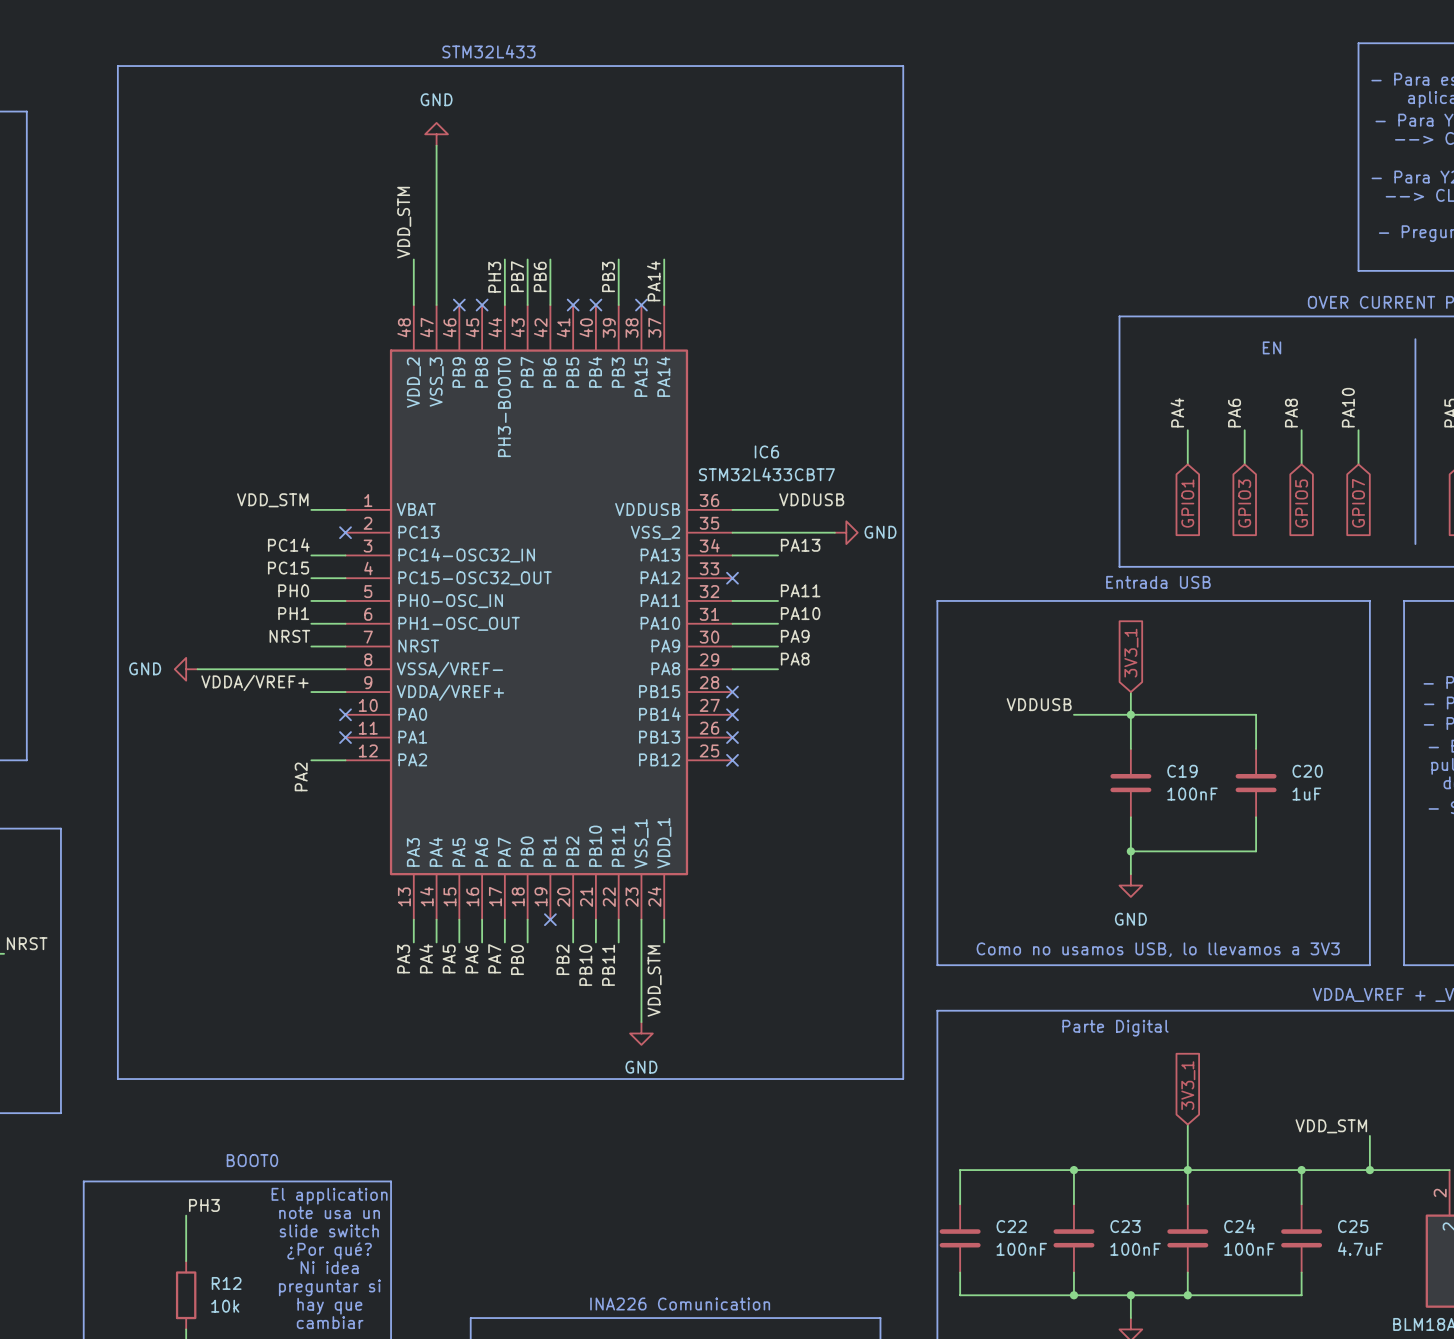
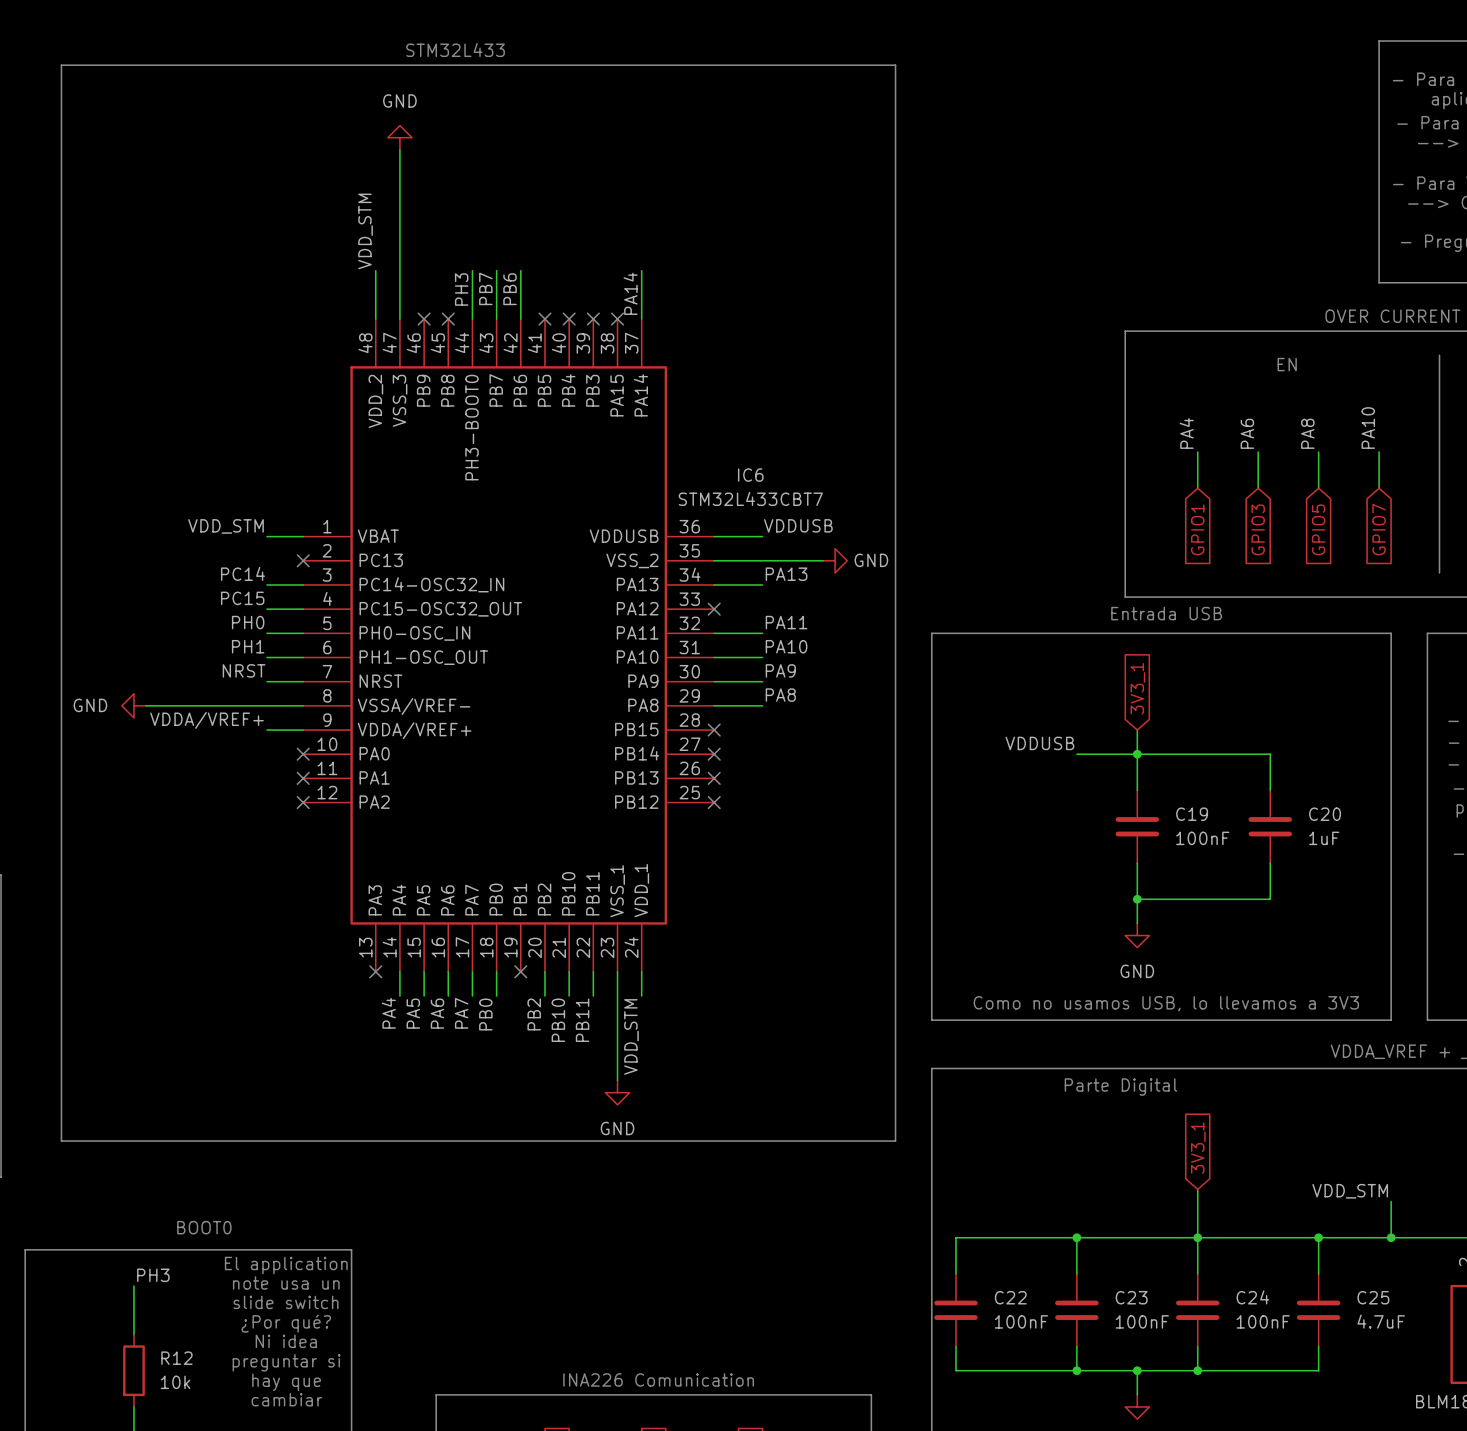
wire: (618, 259) (618, 305) -> none
label: PB3 (608, 276) -> none
no-connect mark: none -> (593, 319)
wire: (311, 760) (345, 760) -> none
no-connect mark: none -> (303, 802)
label: PA2 (301, 776) -> none
wire: (413, 919) (413, 942) -> none
no-connect mark: none -> (375, 971)
label: PA3 (403, 959) -> none

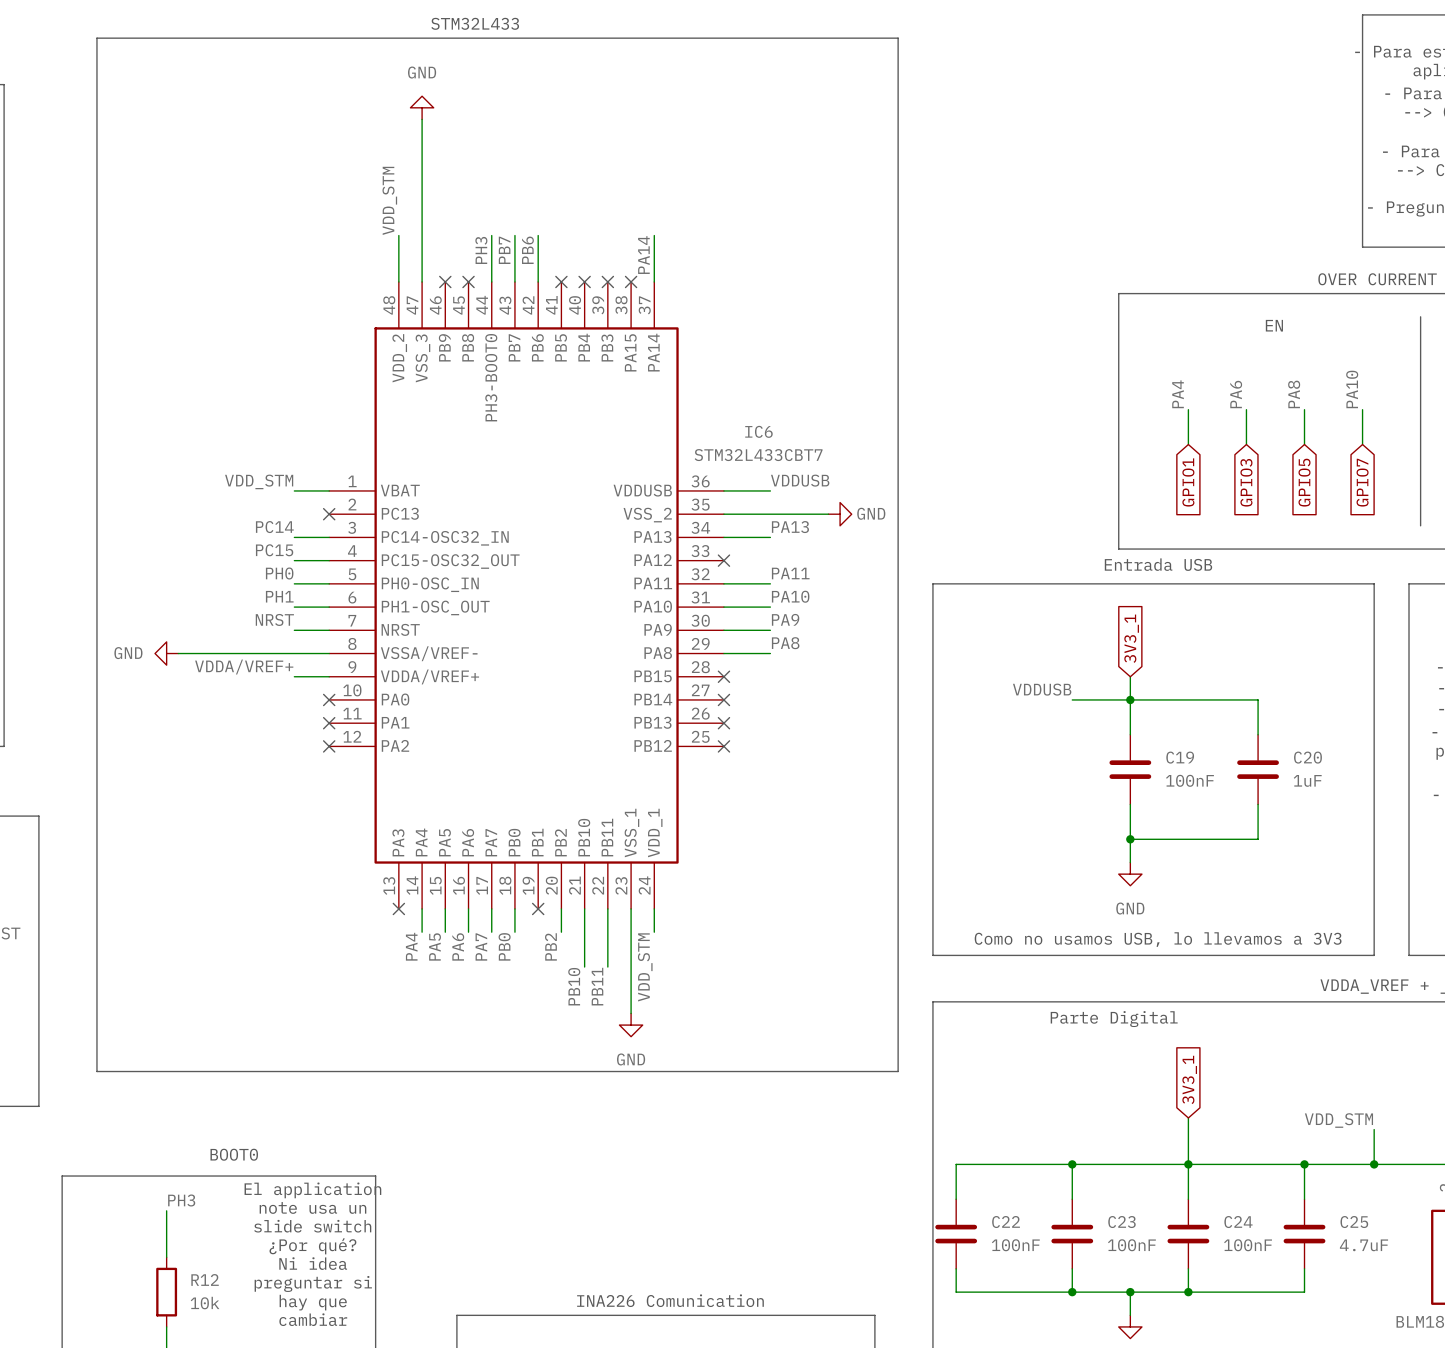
wire: none -> (584, 932) (584, 967)
wire: none -> (607, 932) (607, 967)
label position: PB10 (558, 1020) -> PB10 (574, 986)
label position: PB11 (582, 1020) -> PB11 (597, 986)

